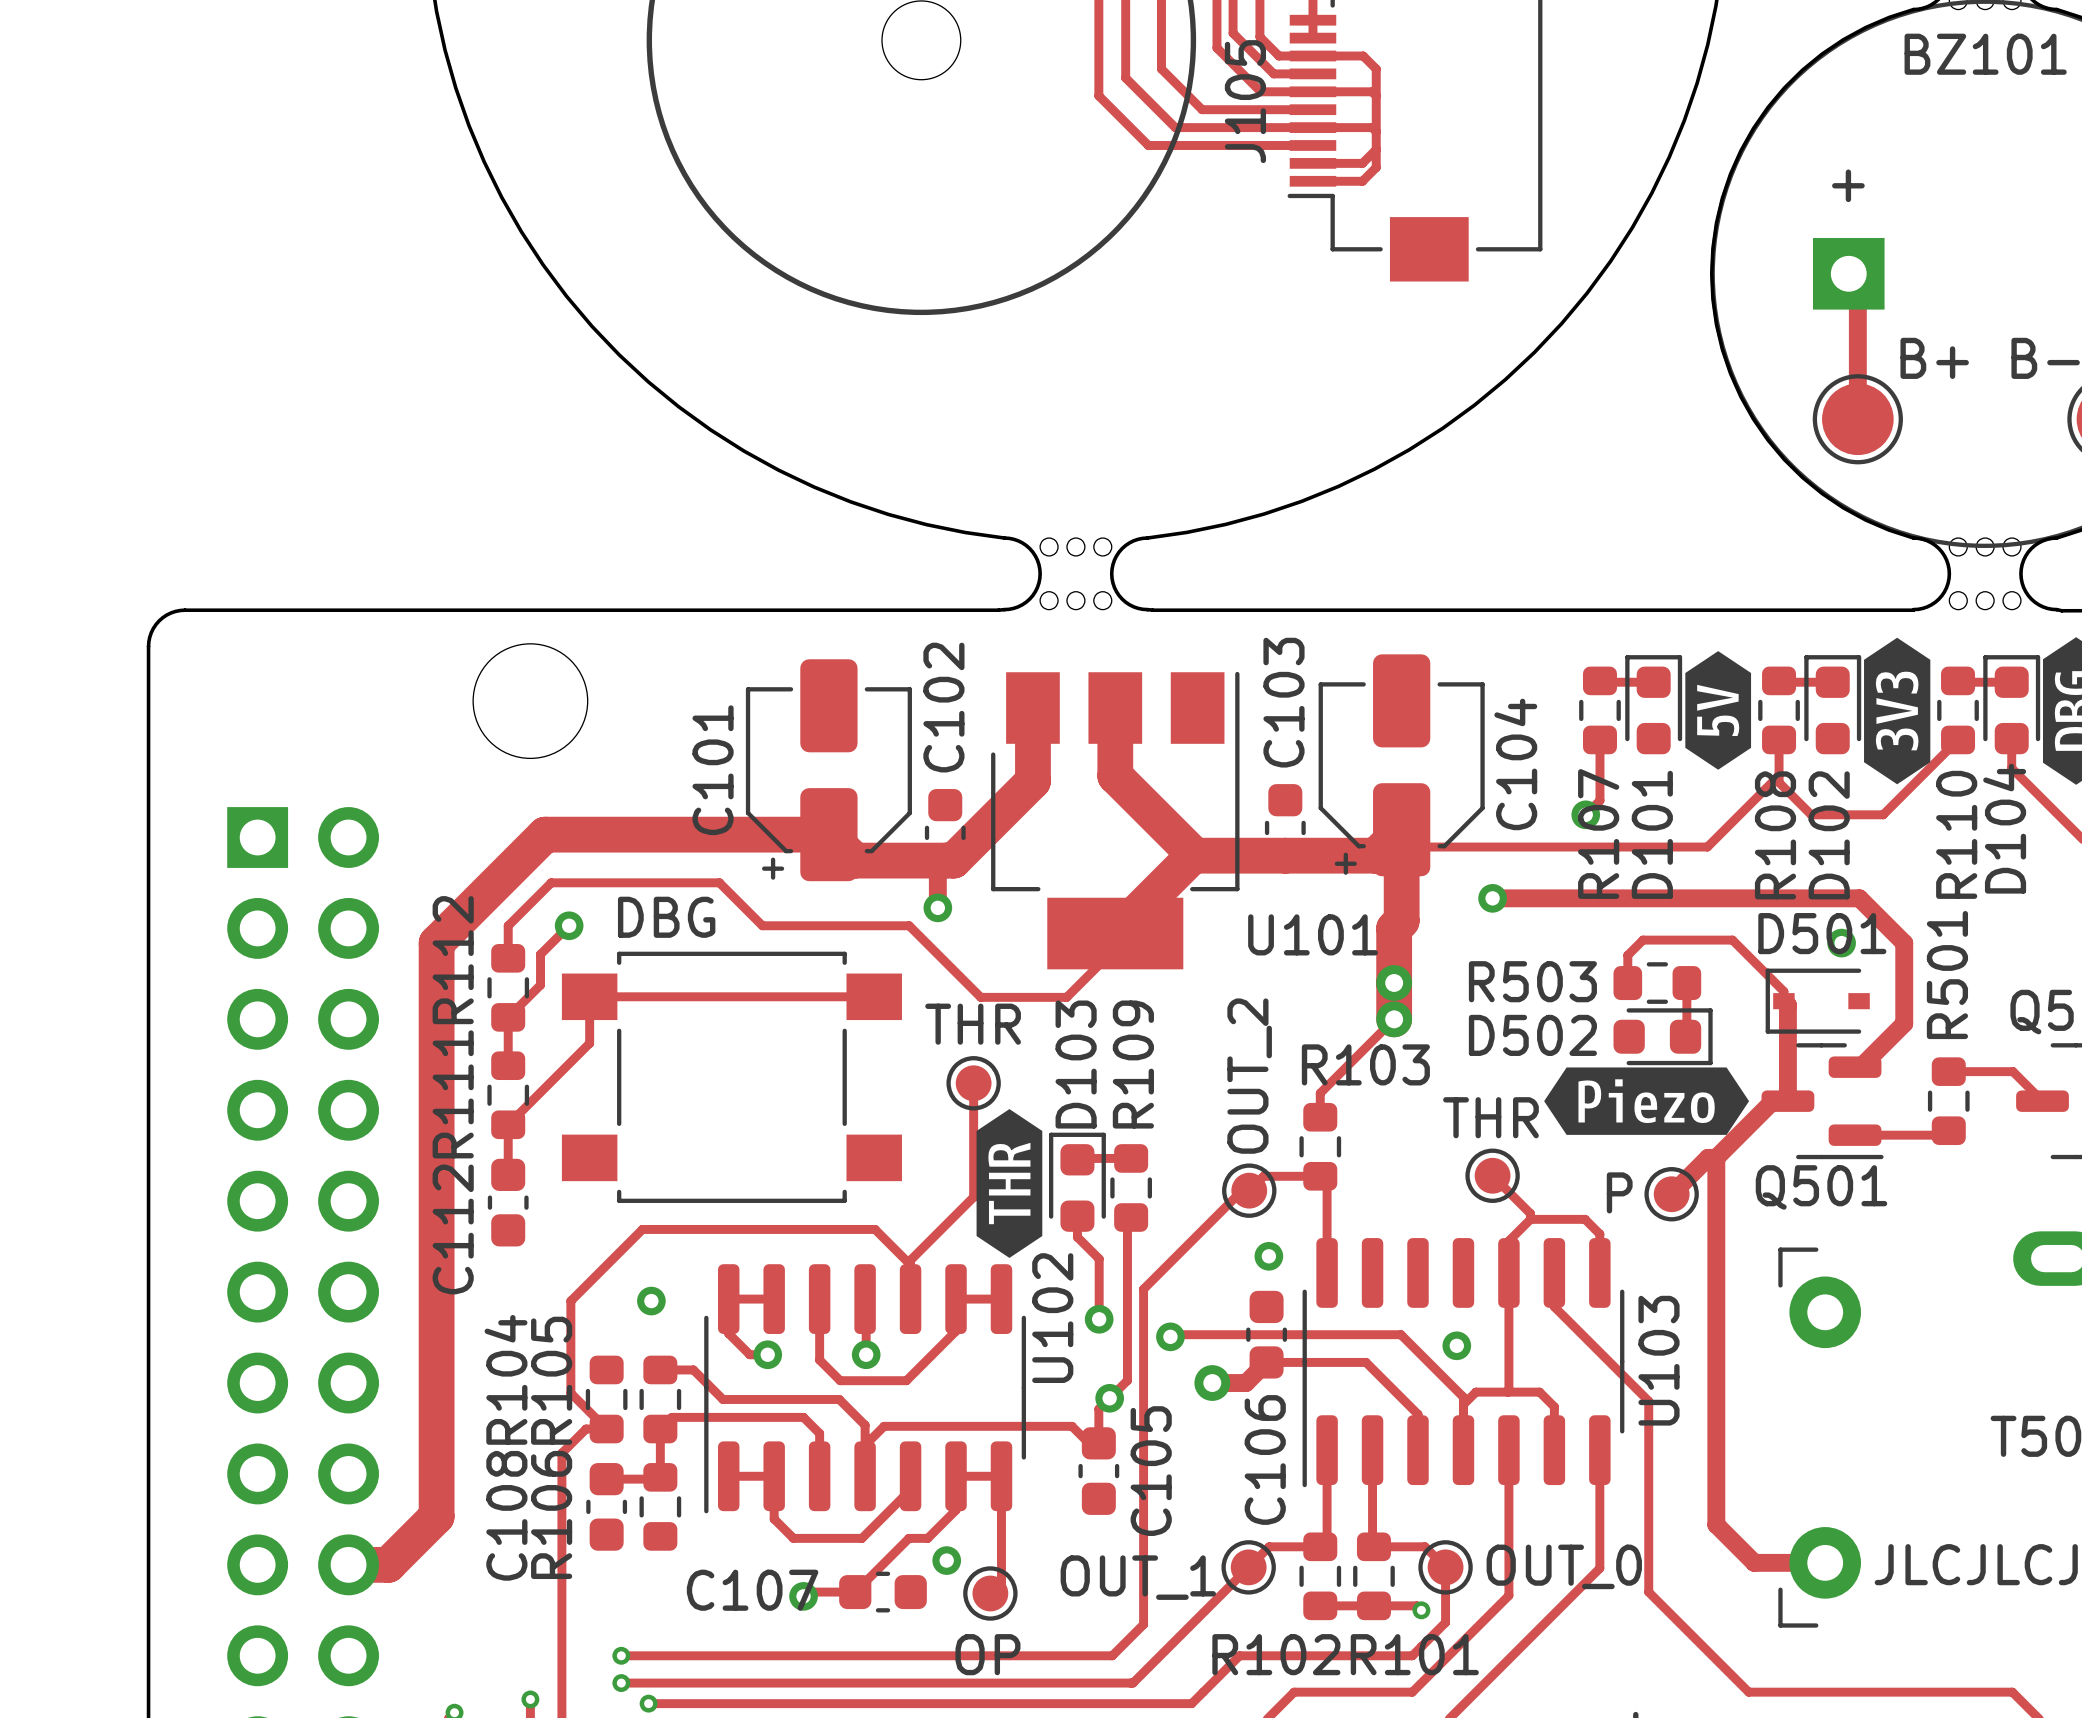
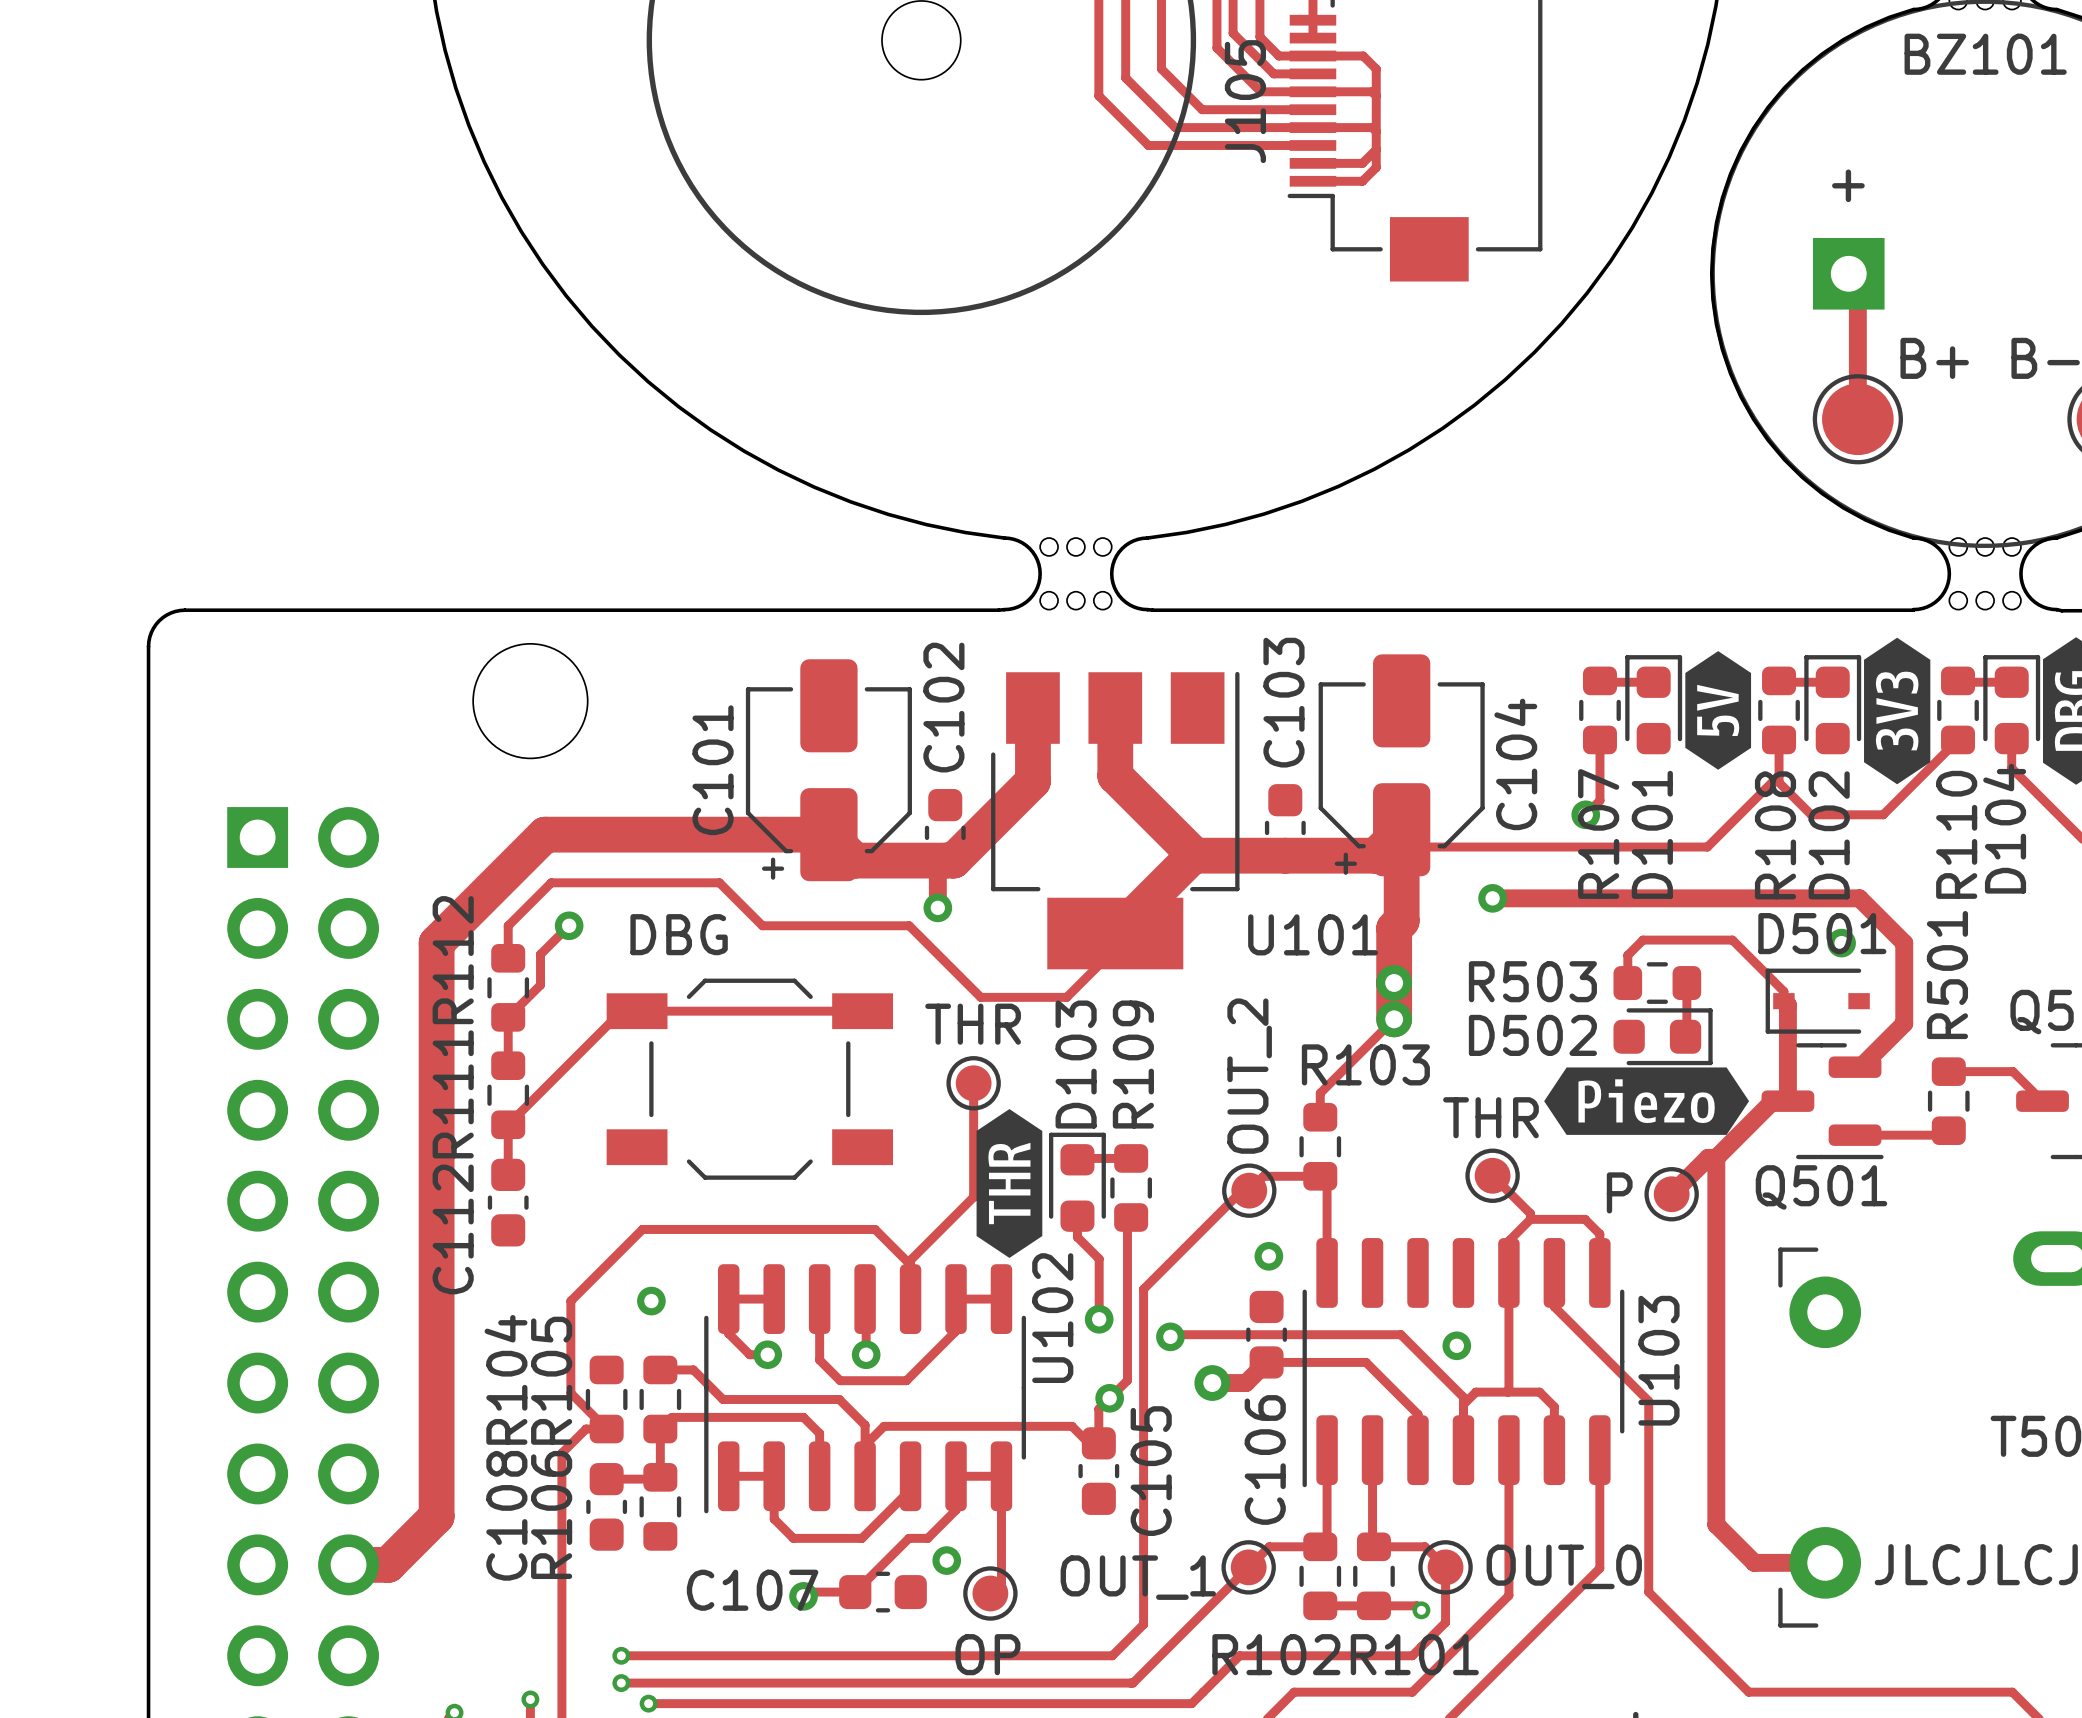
part footprint: [561, 951, 902, 1203] -> [606, 978, 894, 1180]
track: (874, 996) (589, 996) (589, 1043) -> (862, 1011) (621, 1011) (589, 1043)

